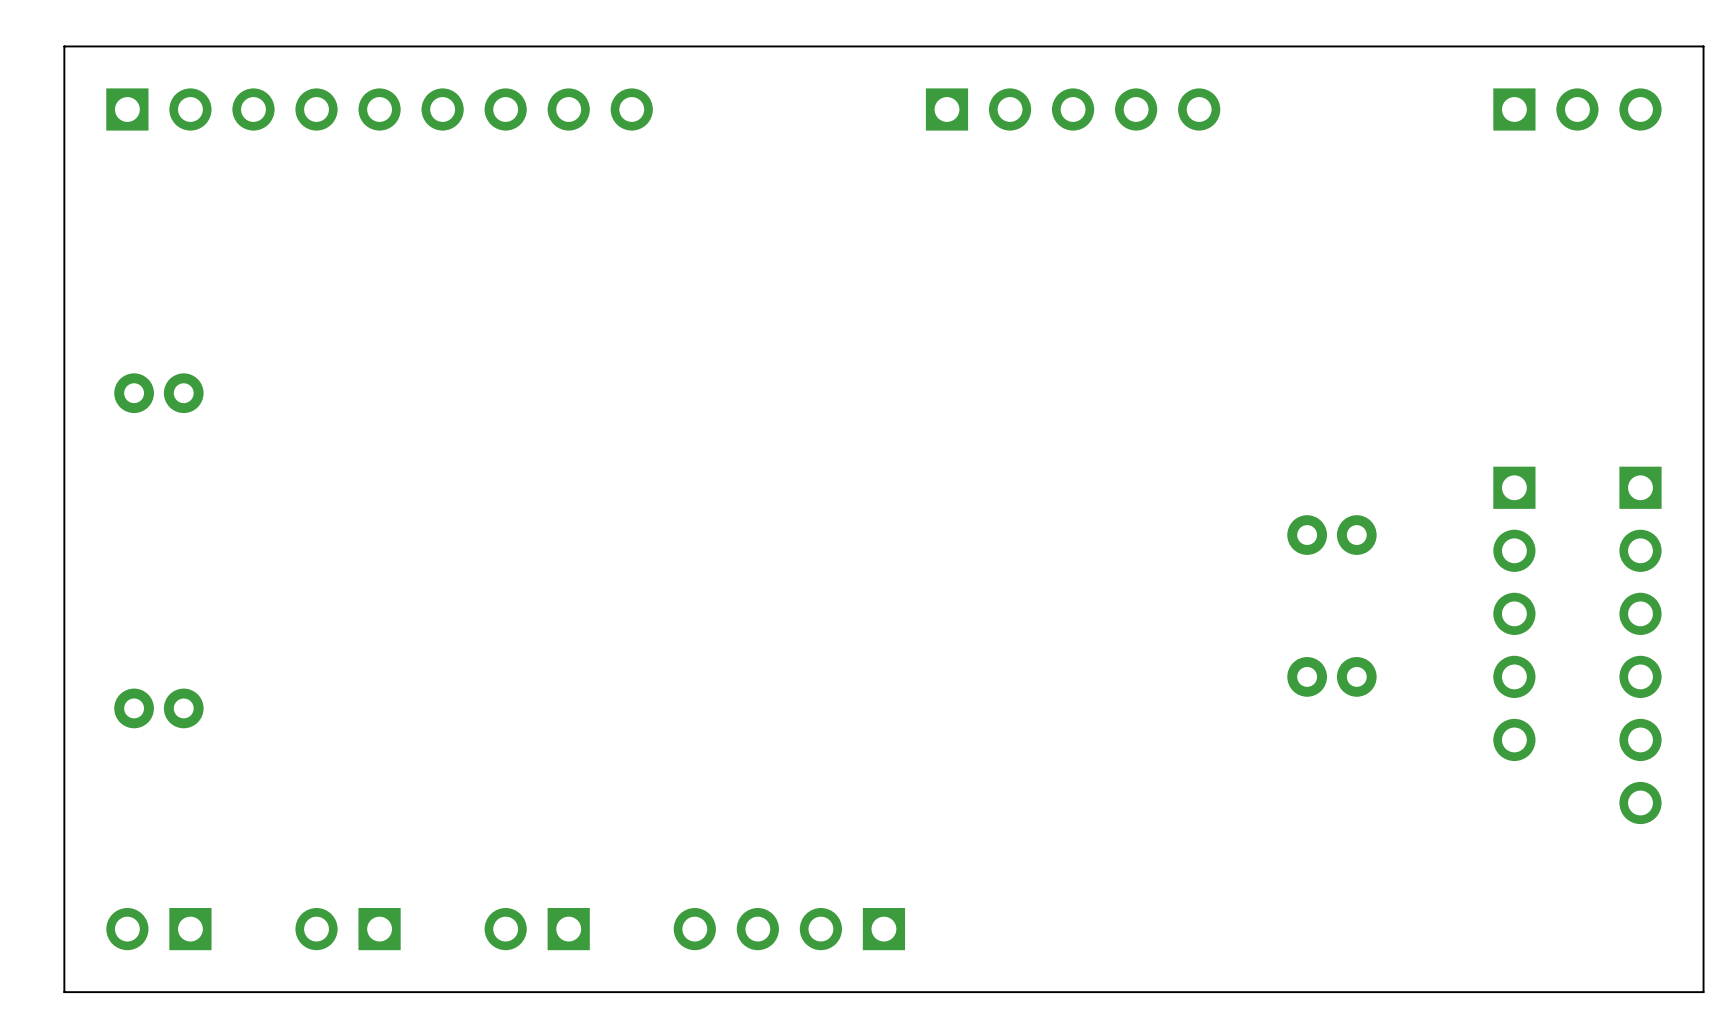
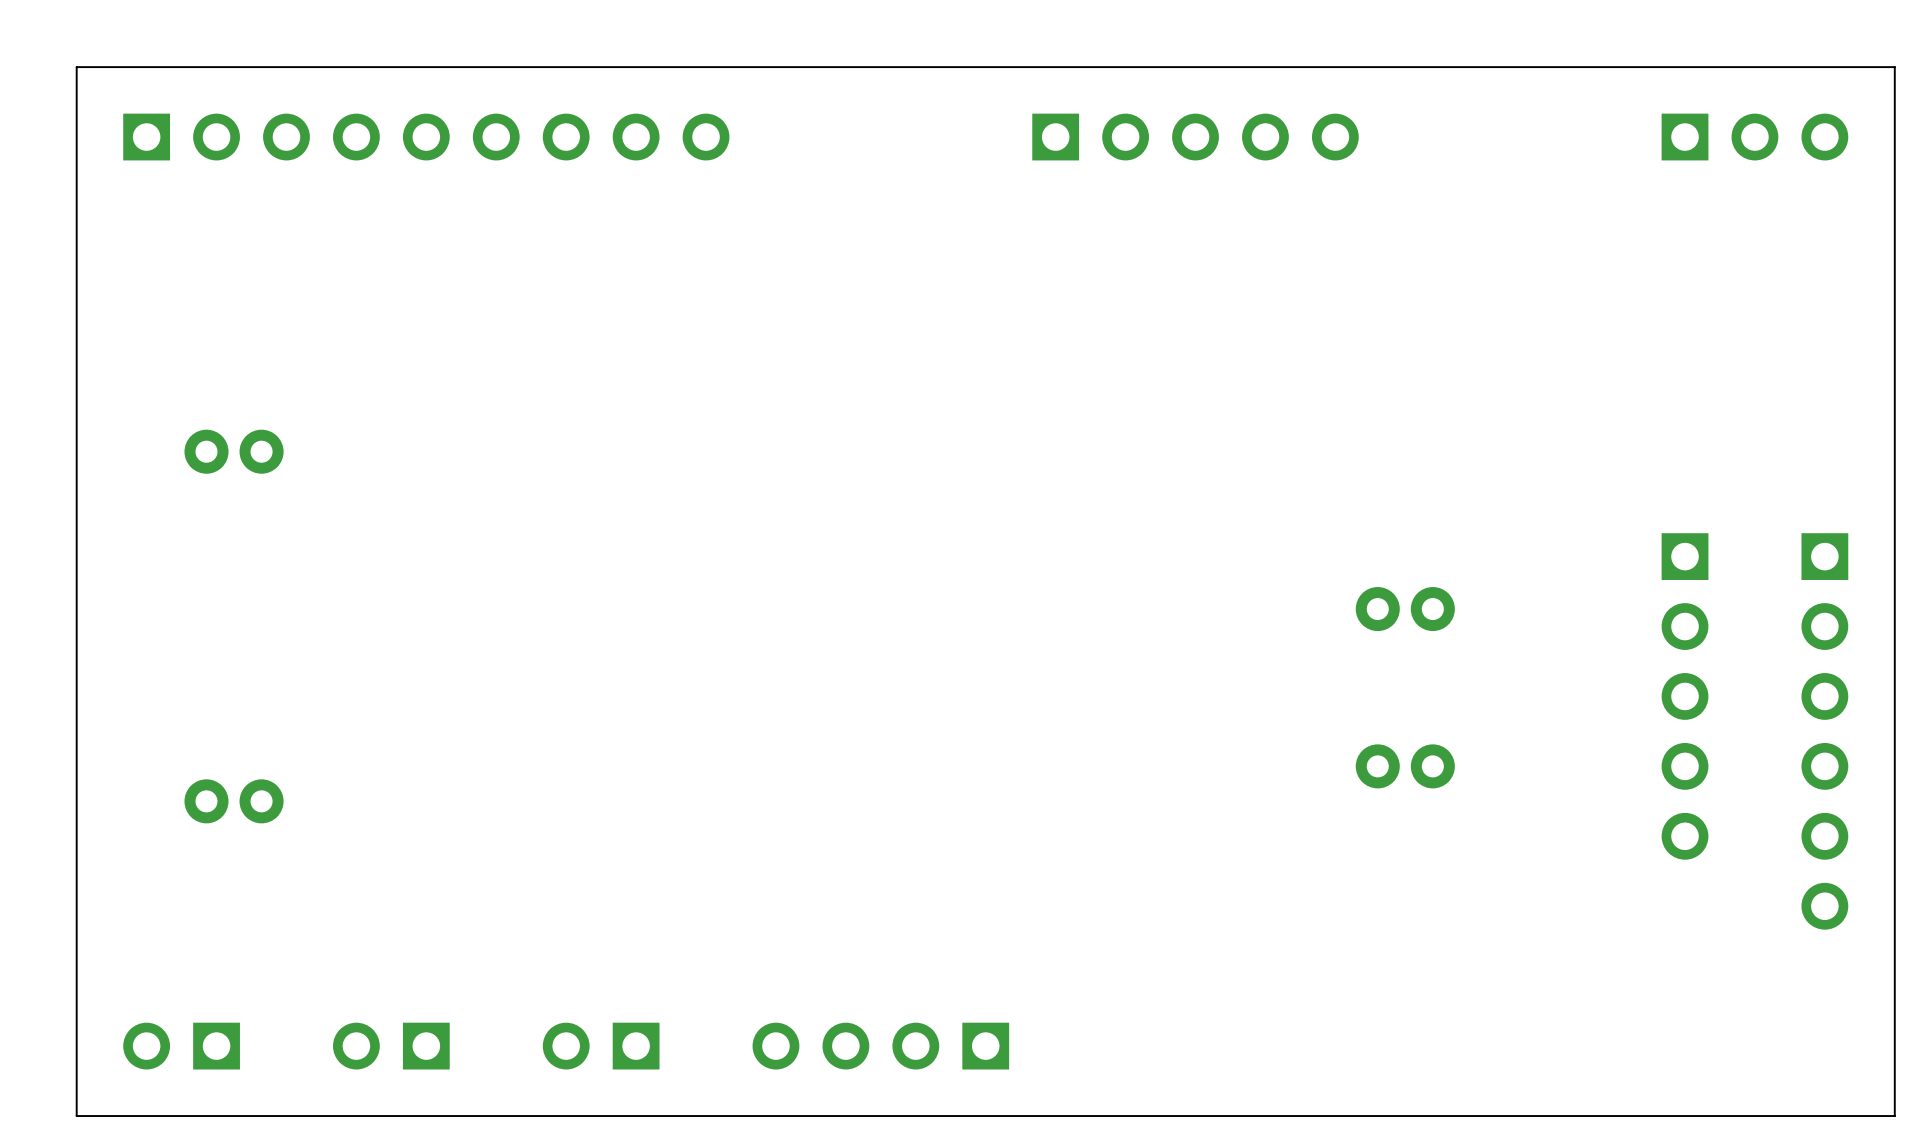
part position: (158, 393) -> (234, 451)
part position: (1331, 535) -> (1405, 609)
part position: (1331, 676) -> (1405, 766)
part position: (158, 708) -> (234, 801)

